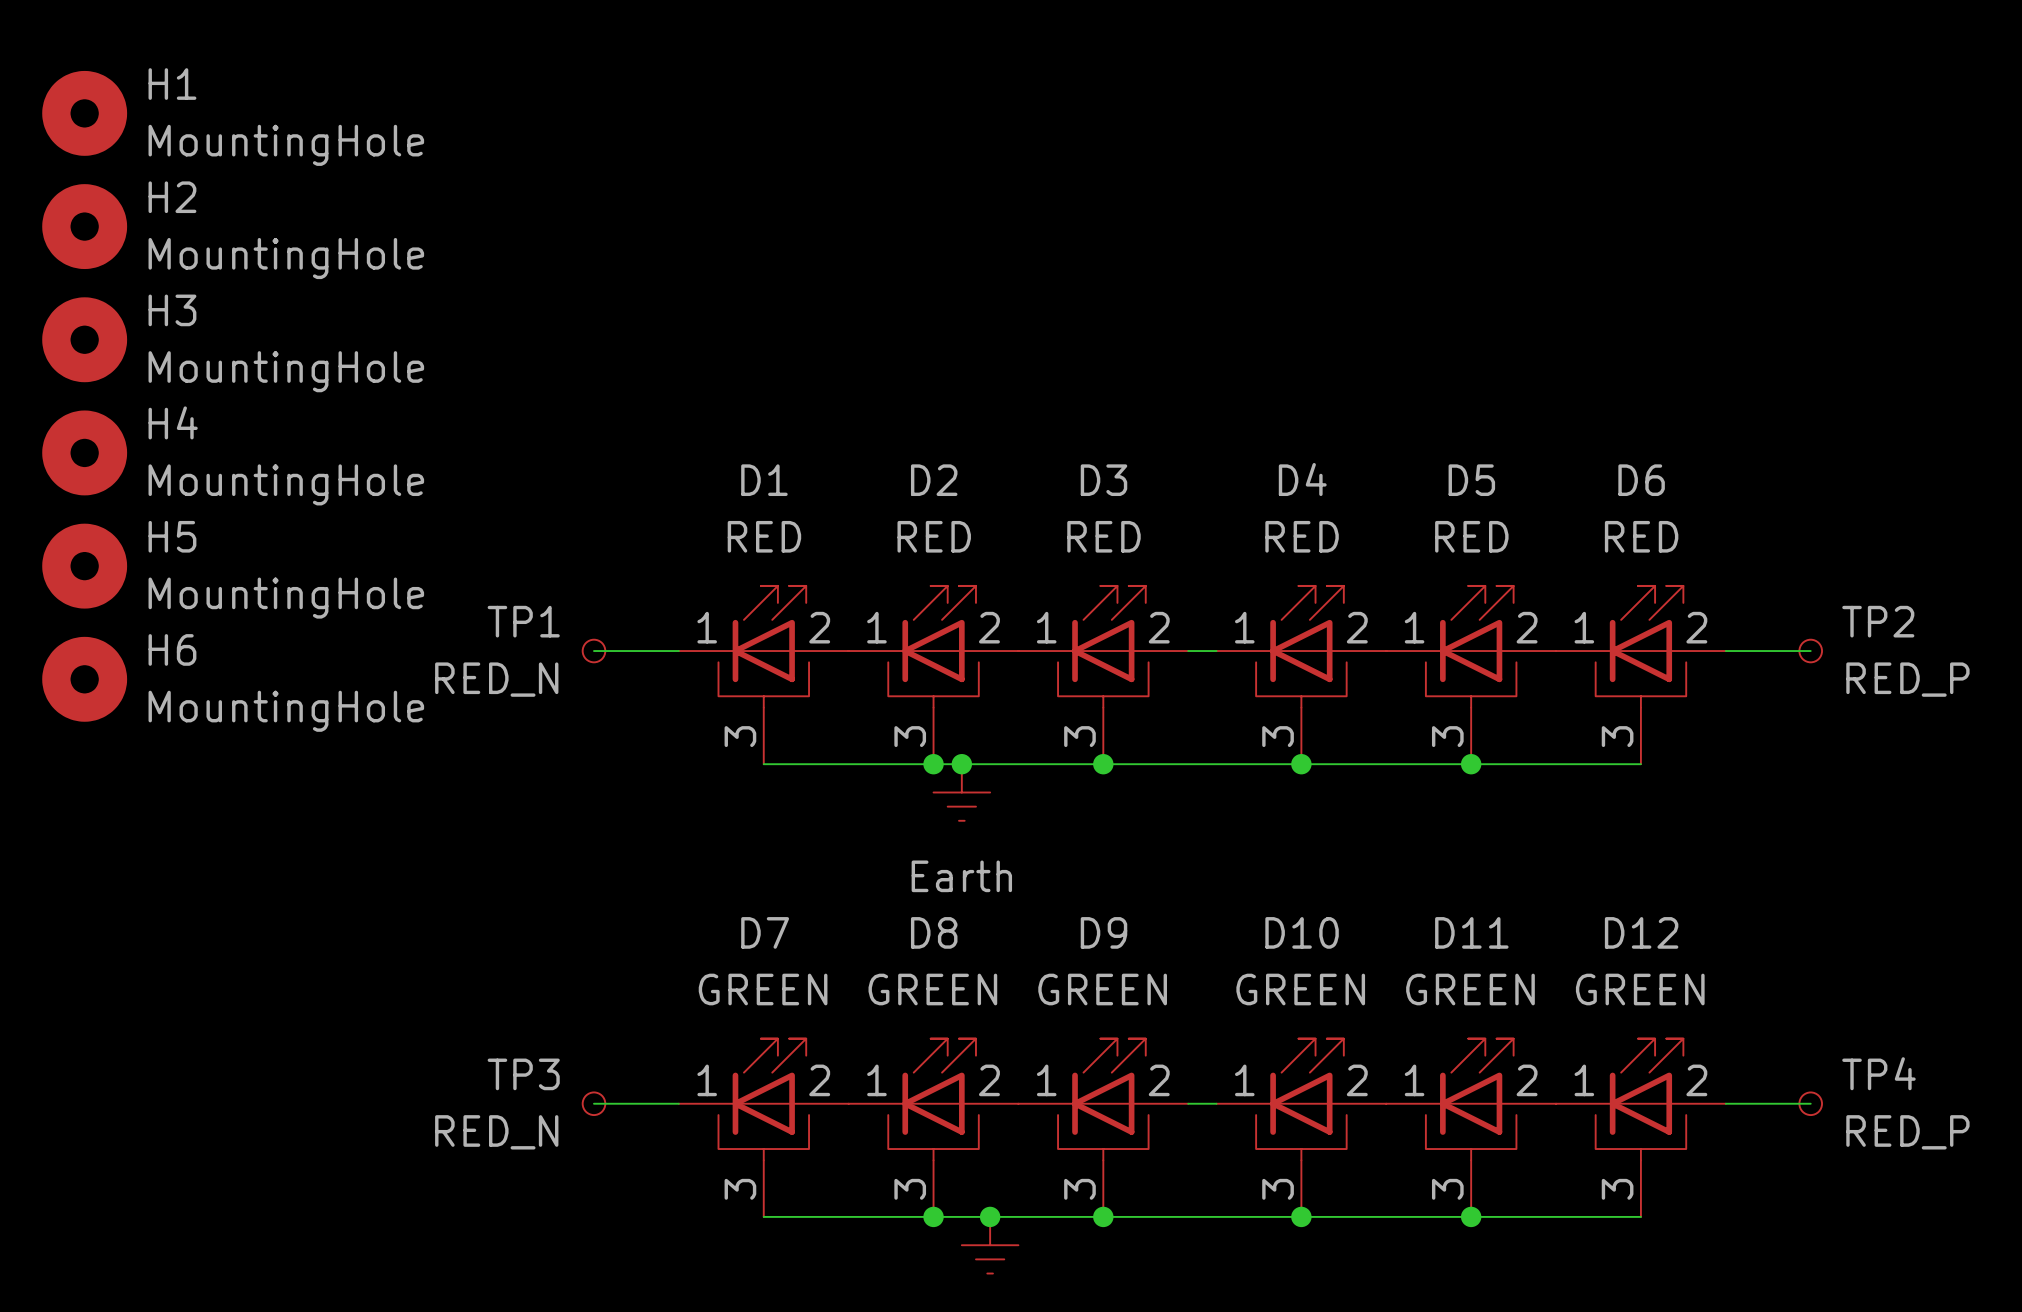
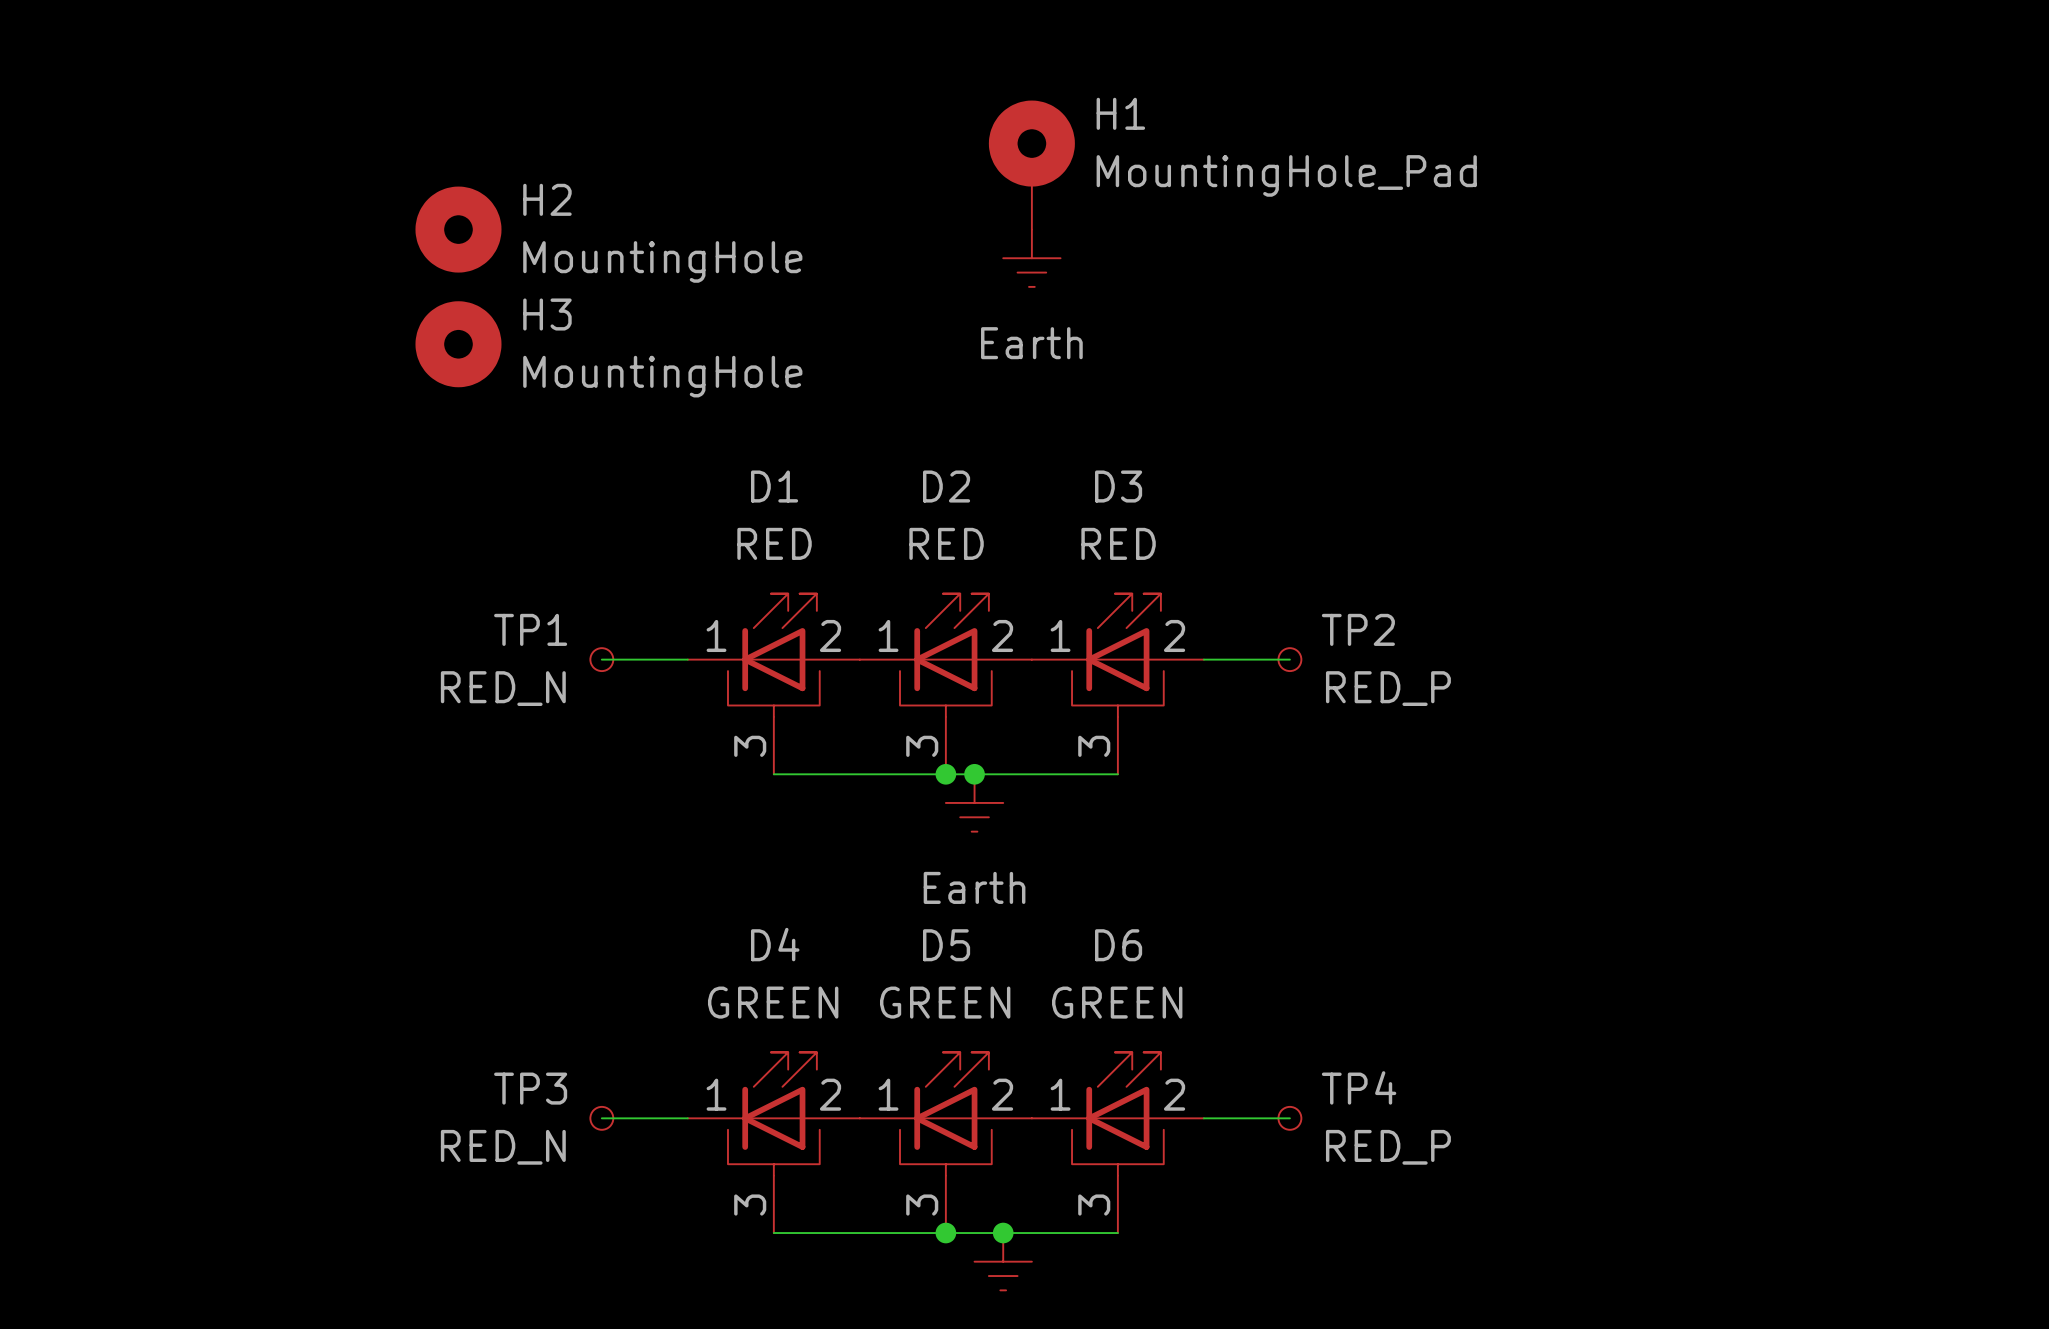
H1 symbol: [42, 70, 128, 156] -> [988, 100, 1075, 230]
H1 value: MountingHole (286, 145) -> MountingHole_Pad (1286, 175)
H2 position: (84, 226) -> (458, 229)
power symbol: none -> Earth (1031, 258)
H3 position: (84, 339) -> (458, 344)
H4: MountingHole (84, 452) -> none
H5: MountingHole (84, 566) -> none
wire: (1725, 651) (1810, 651) -> none
TP2 position: (1810, 651) -> (1289, 659)
D4: RED (1301, 675) -> none
D5: RED (1471, 675) -> none
D6: RED (1640, 675) -> none
H6: MountingHole (84, 679) -> none
wire: (1103, 764) (1640, 764) -> none
junction: (1103, 764) -> none
junction: (1301, 764) -> none
junction: (1471, 764) -> none
D7 name: D7 (765, 932) -> D4 (775, 944)
D8 name: D8 (934, 932) -> D5 (946, 945)
D9 name: D9 (1103, 932) -> D6 (1118, 945)
wire: (1725, 1103) (1810, 1103) -> none
TP4 position: (1810, 1103) -> (1289, 1118)
D10: GREEN (1301, 1127) -> none
D11: GREEN (1471, 1127) -> none
D12: GREEN (1640, 1127) -> none
wire: (1103, 1216) (1640, 1216) -> none
junction: (1103, 1216) -> none
junction: (1301, 1216) -> none
junction: (1471, 1216) -> none

